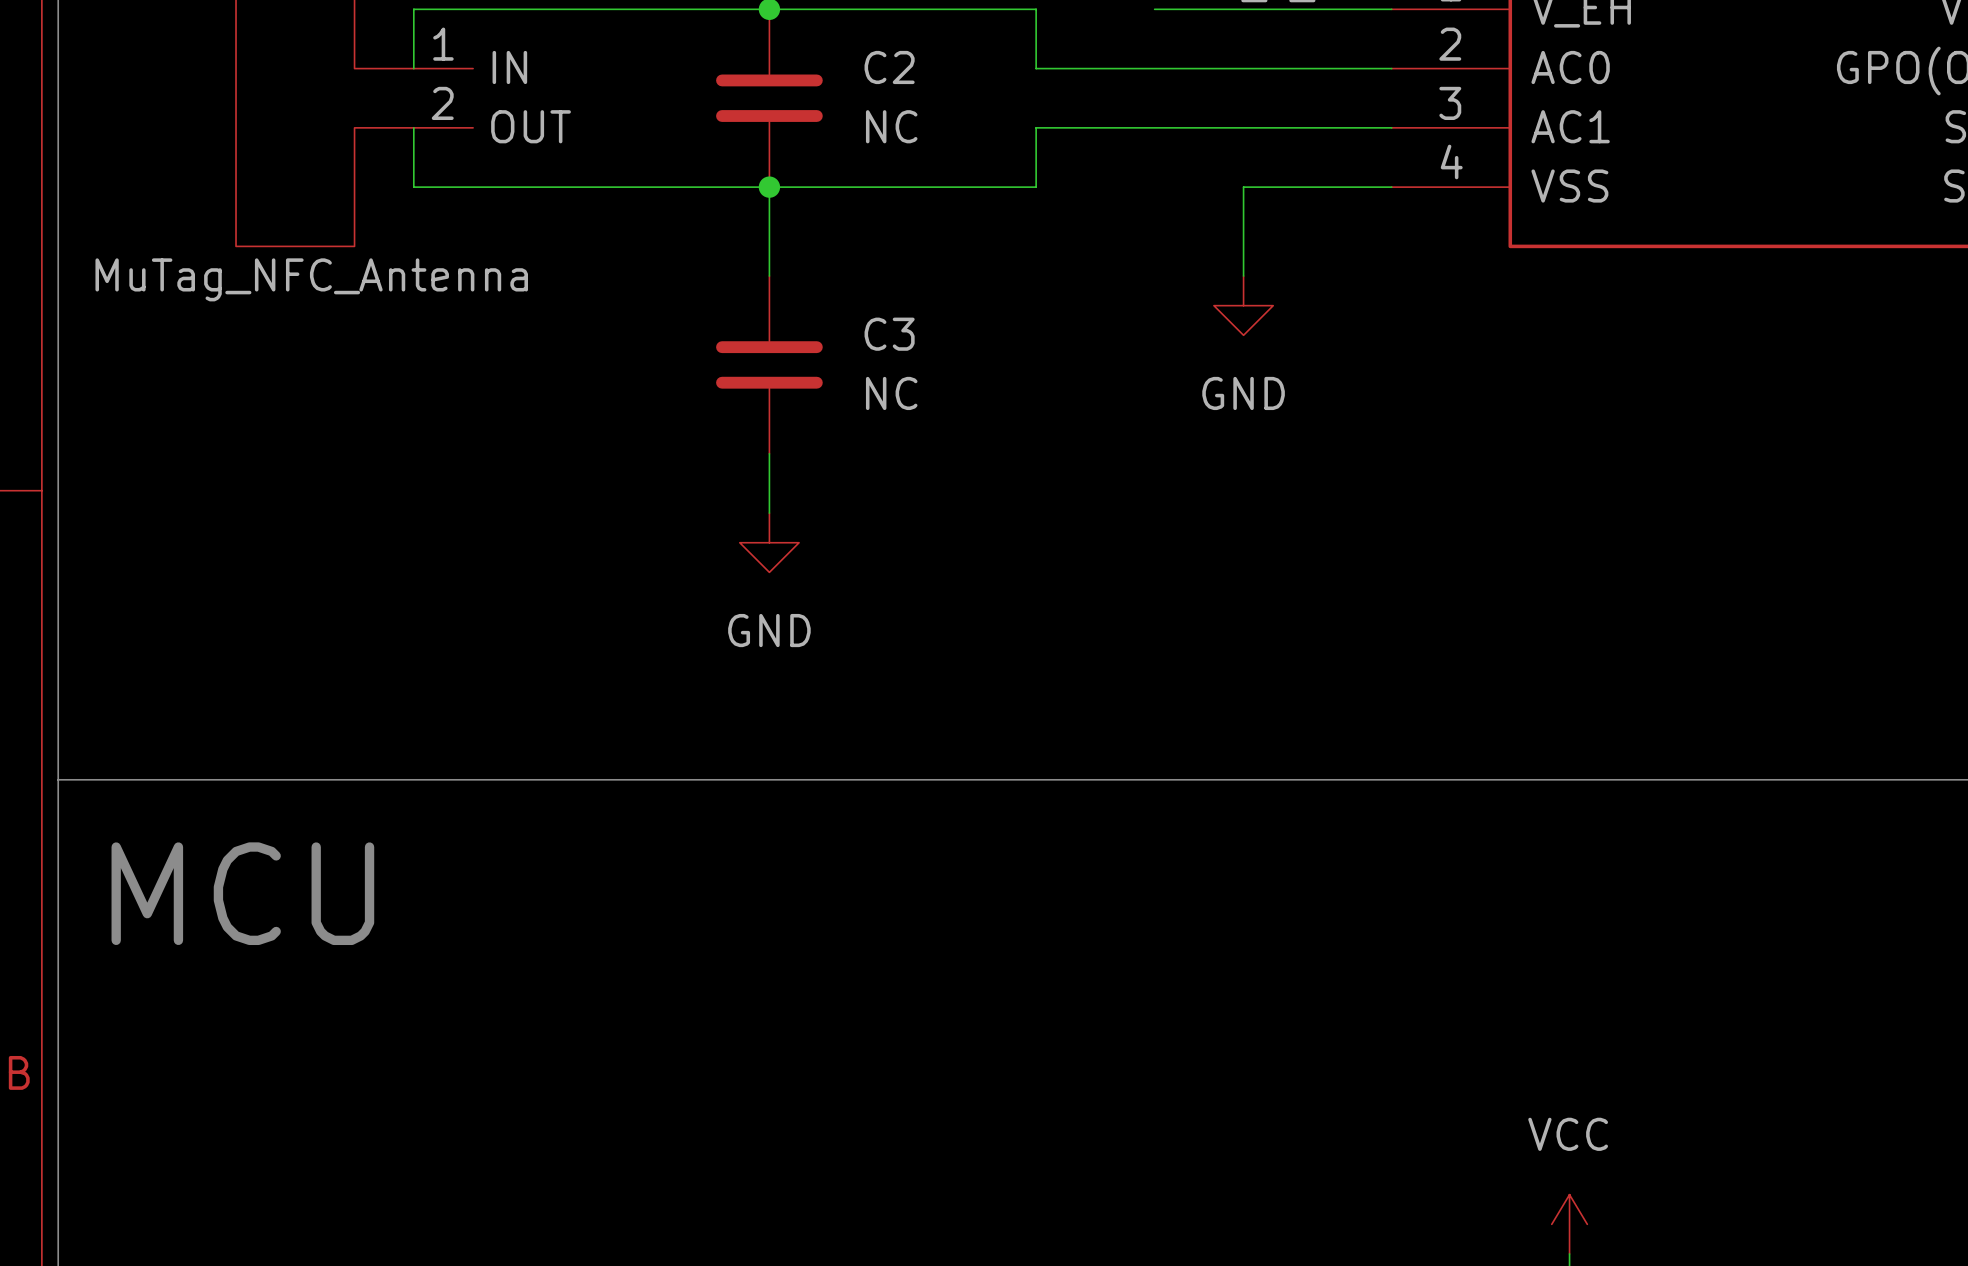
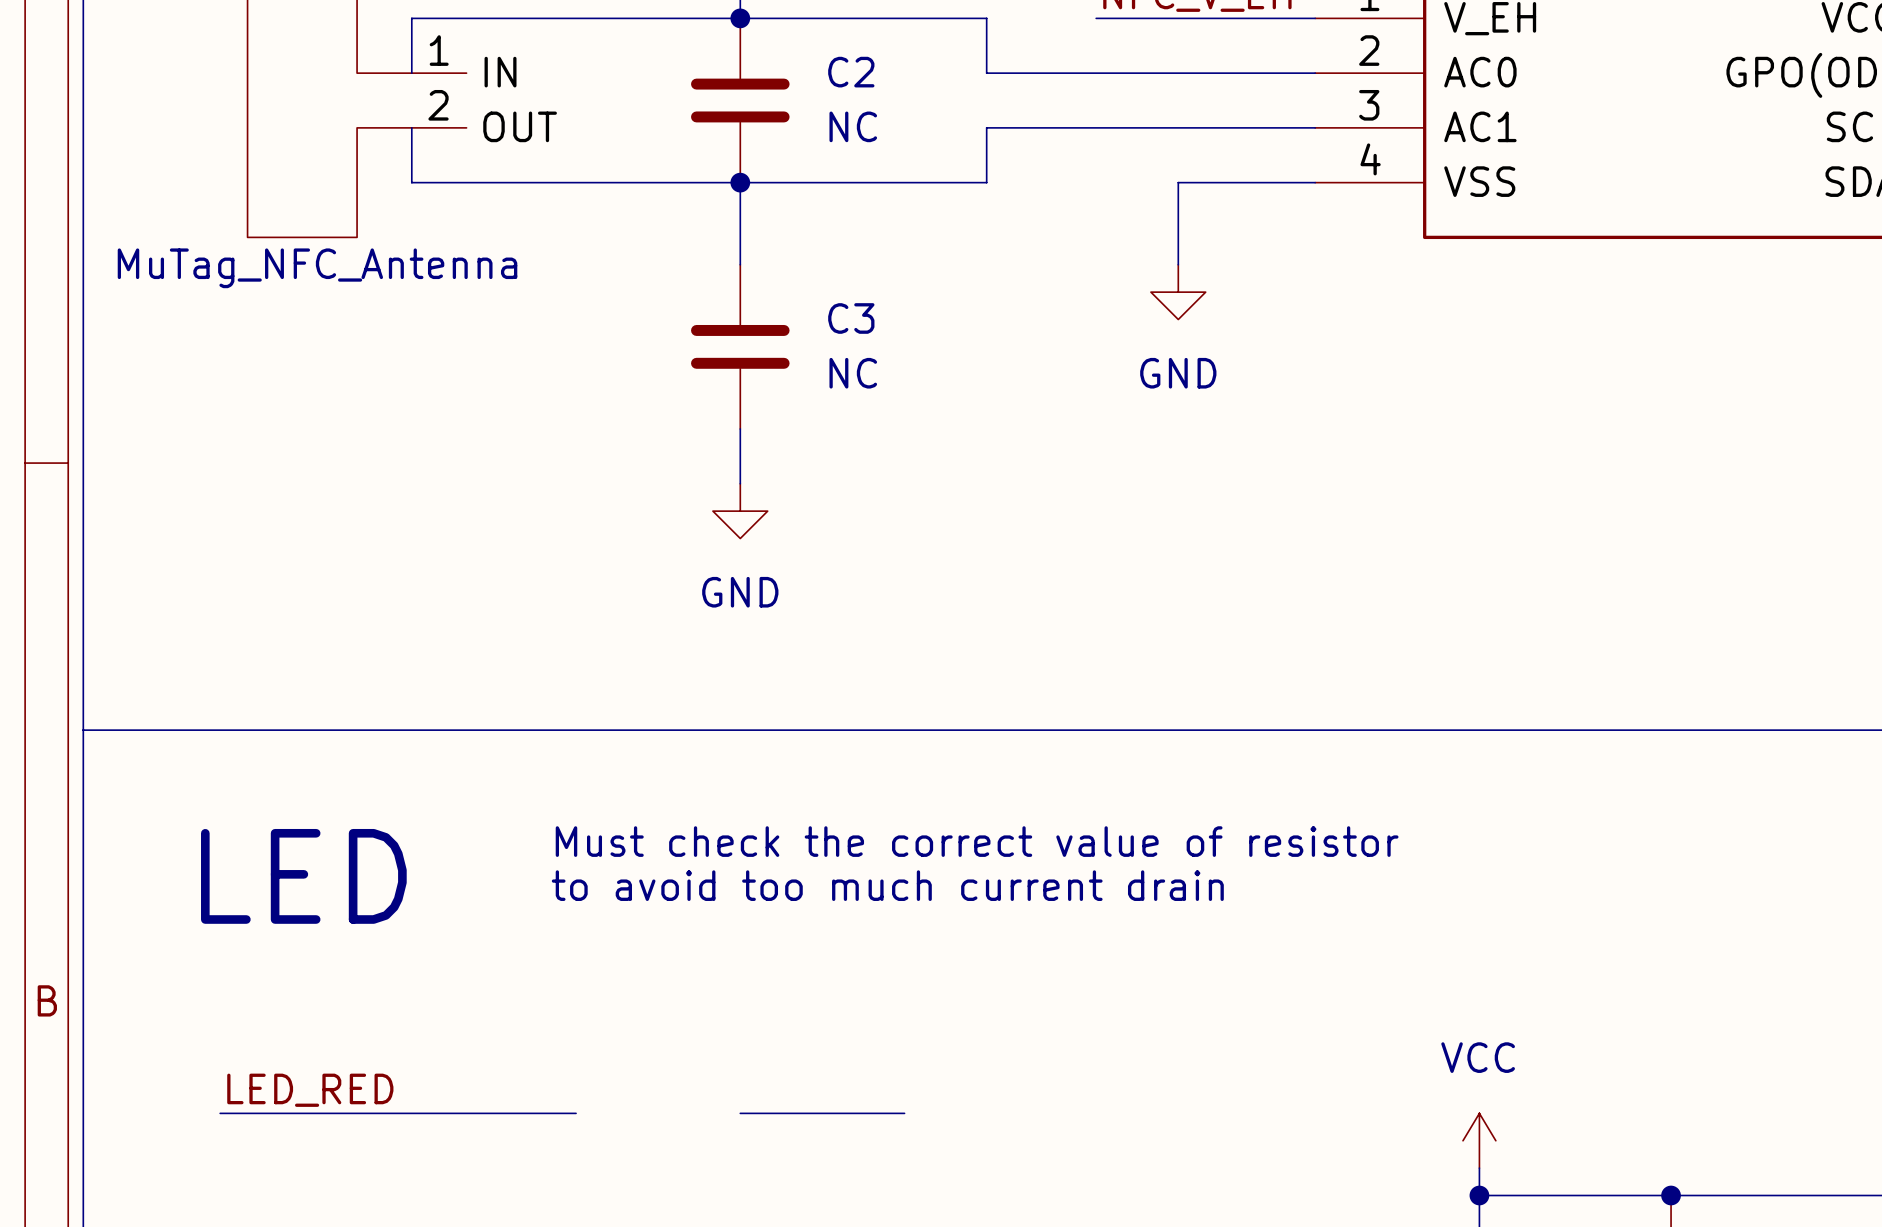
text: MCU (242, 893) -> none
text: none -> Must check the correct value of resistor (977, 841)
text: none -> LED (303, 876)
text: none -> to avoid too much current drain (887, 885)
label: none -> LED_RED (310, 1090)
wire: none -> (220, 1113) (576, 1113)
wire: none -> (740, 1113) (904, 1113)

